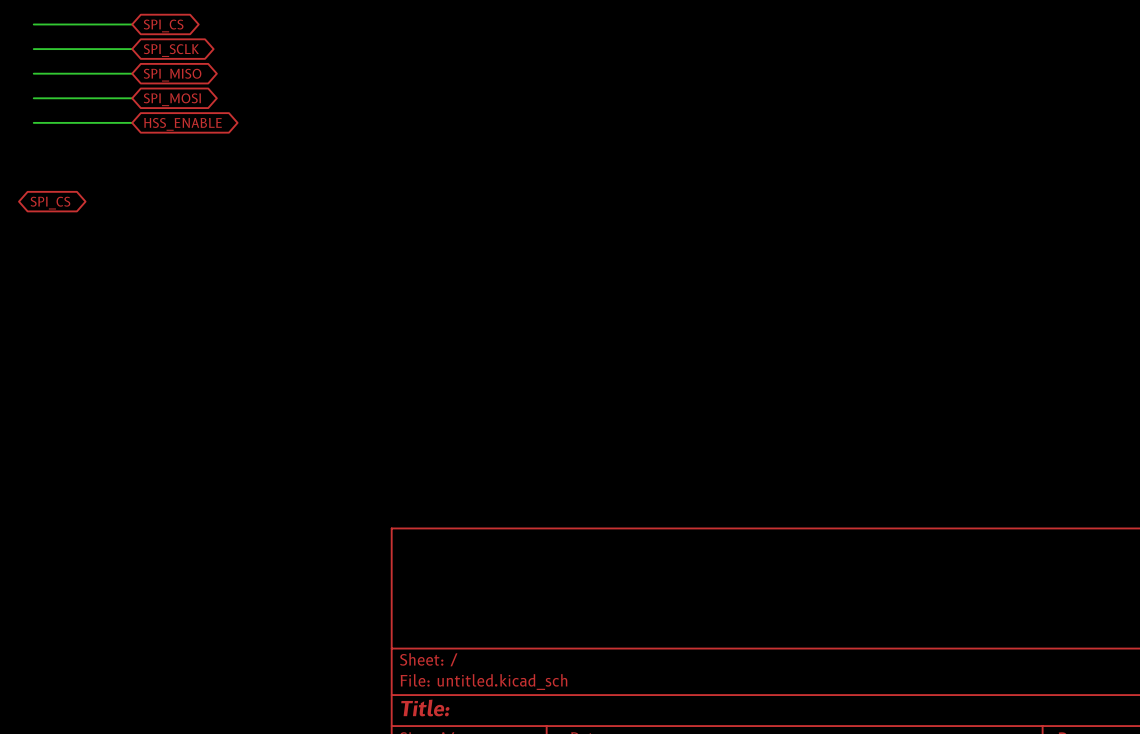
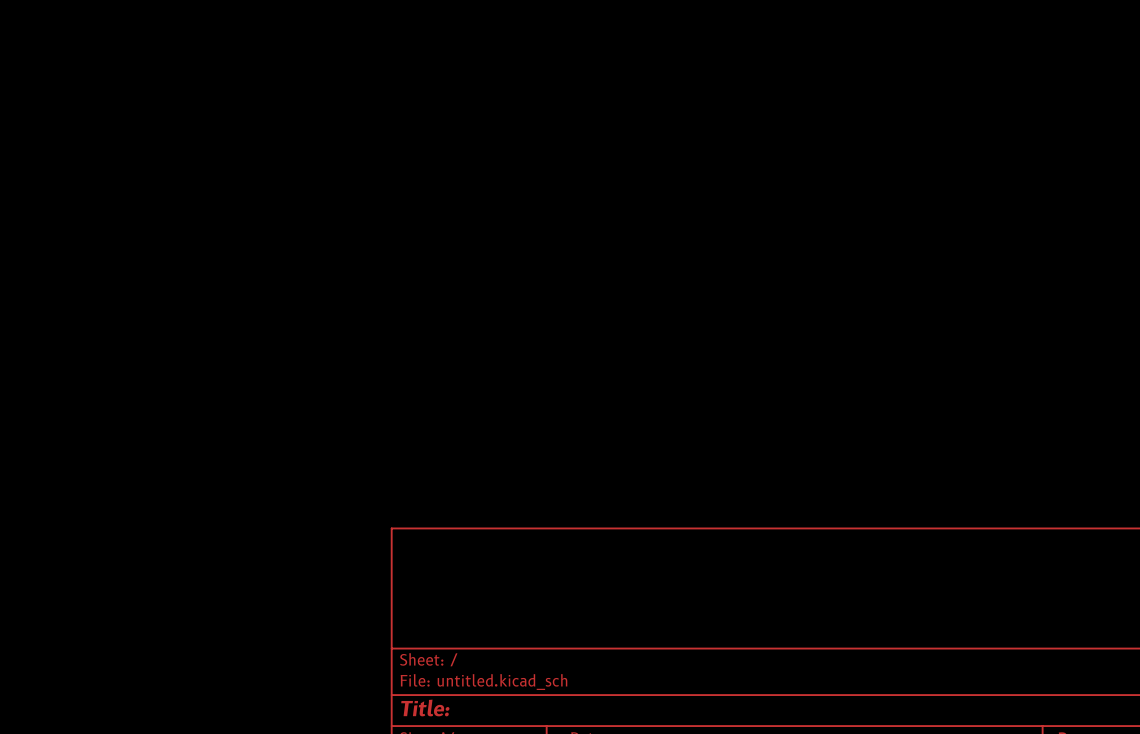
wire: (33, 24) (132, 24) -> none
global label: SPI_CS (163, 25) -> none
wire: (33, 49) (132, 49) -> none
global label: SPI_SCLK (171, 50) -> none
wire: (33, 73) (132, 73) -> none
global label: SPI_MISO (172, 75) -> none
wire: (33, 98) (132, 98) -> none
global label: SPI_MOSI (172, 99) -> none
wire: (33, 122) (132, 122) -> none
global label: HSS_ENABLE (183, 124) -> none
global label: SPI_CS (50, 203) -> none

